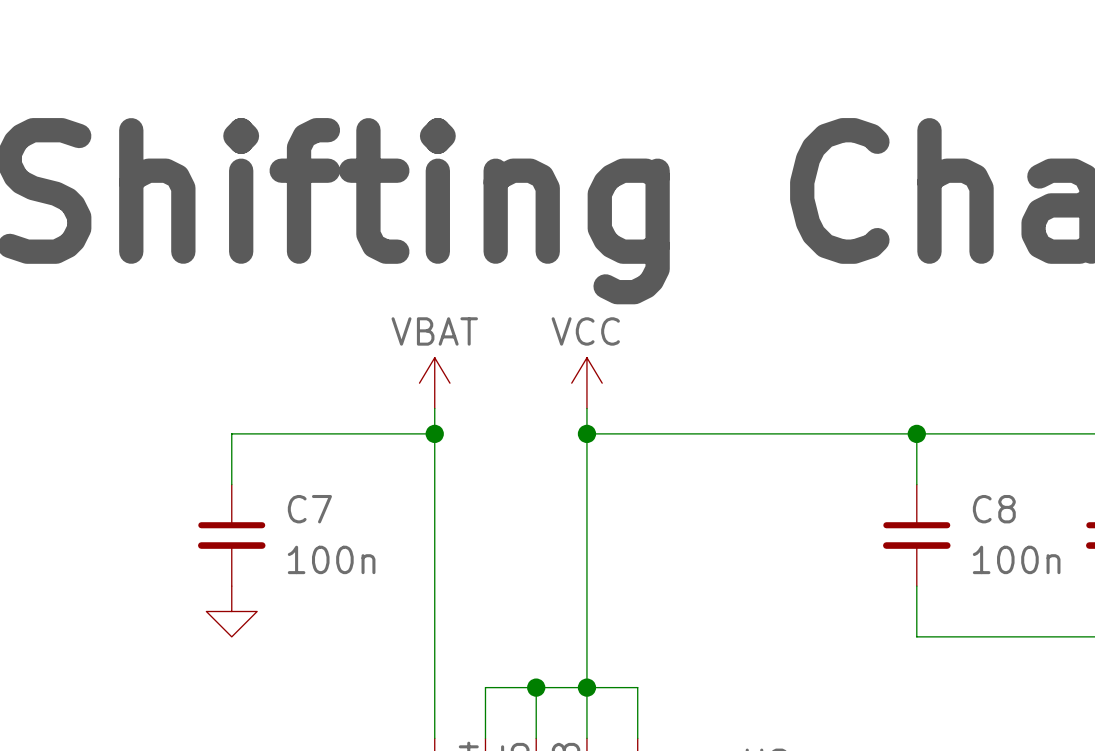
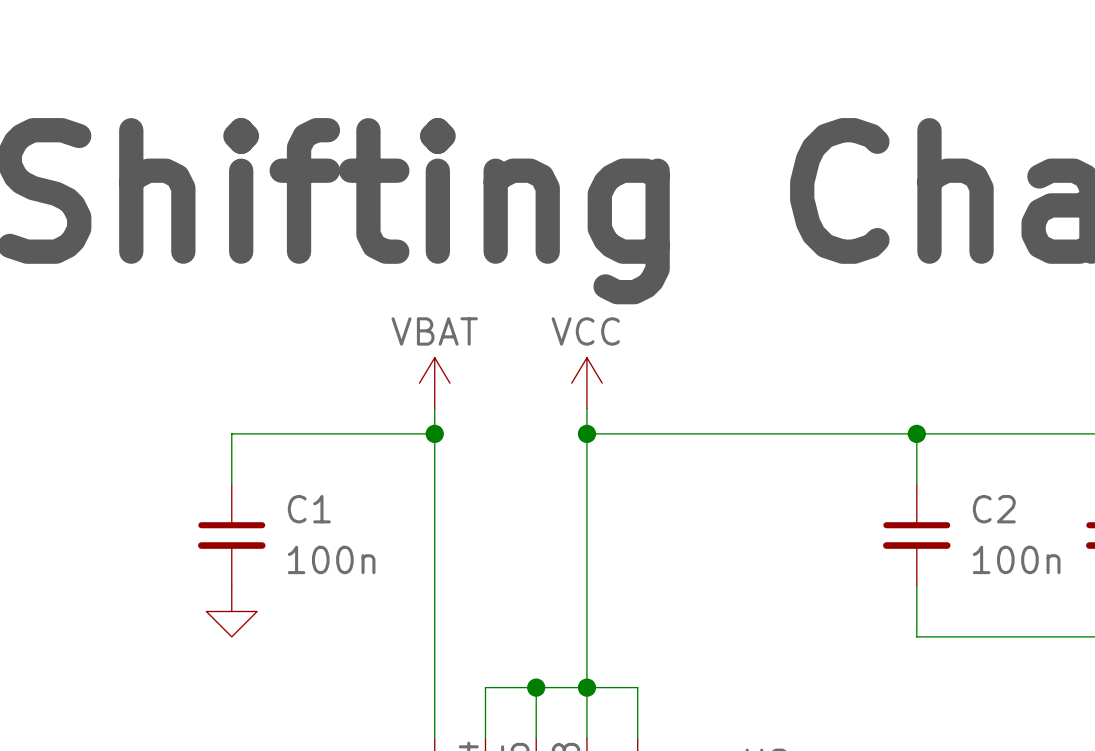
C7 name: C7 (309, 509) -> C1 (309, 509)
C8 name: C8 (994, 509) -> C2 (994, 509)

